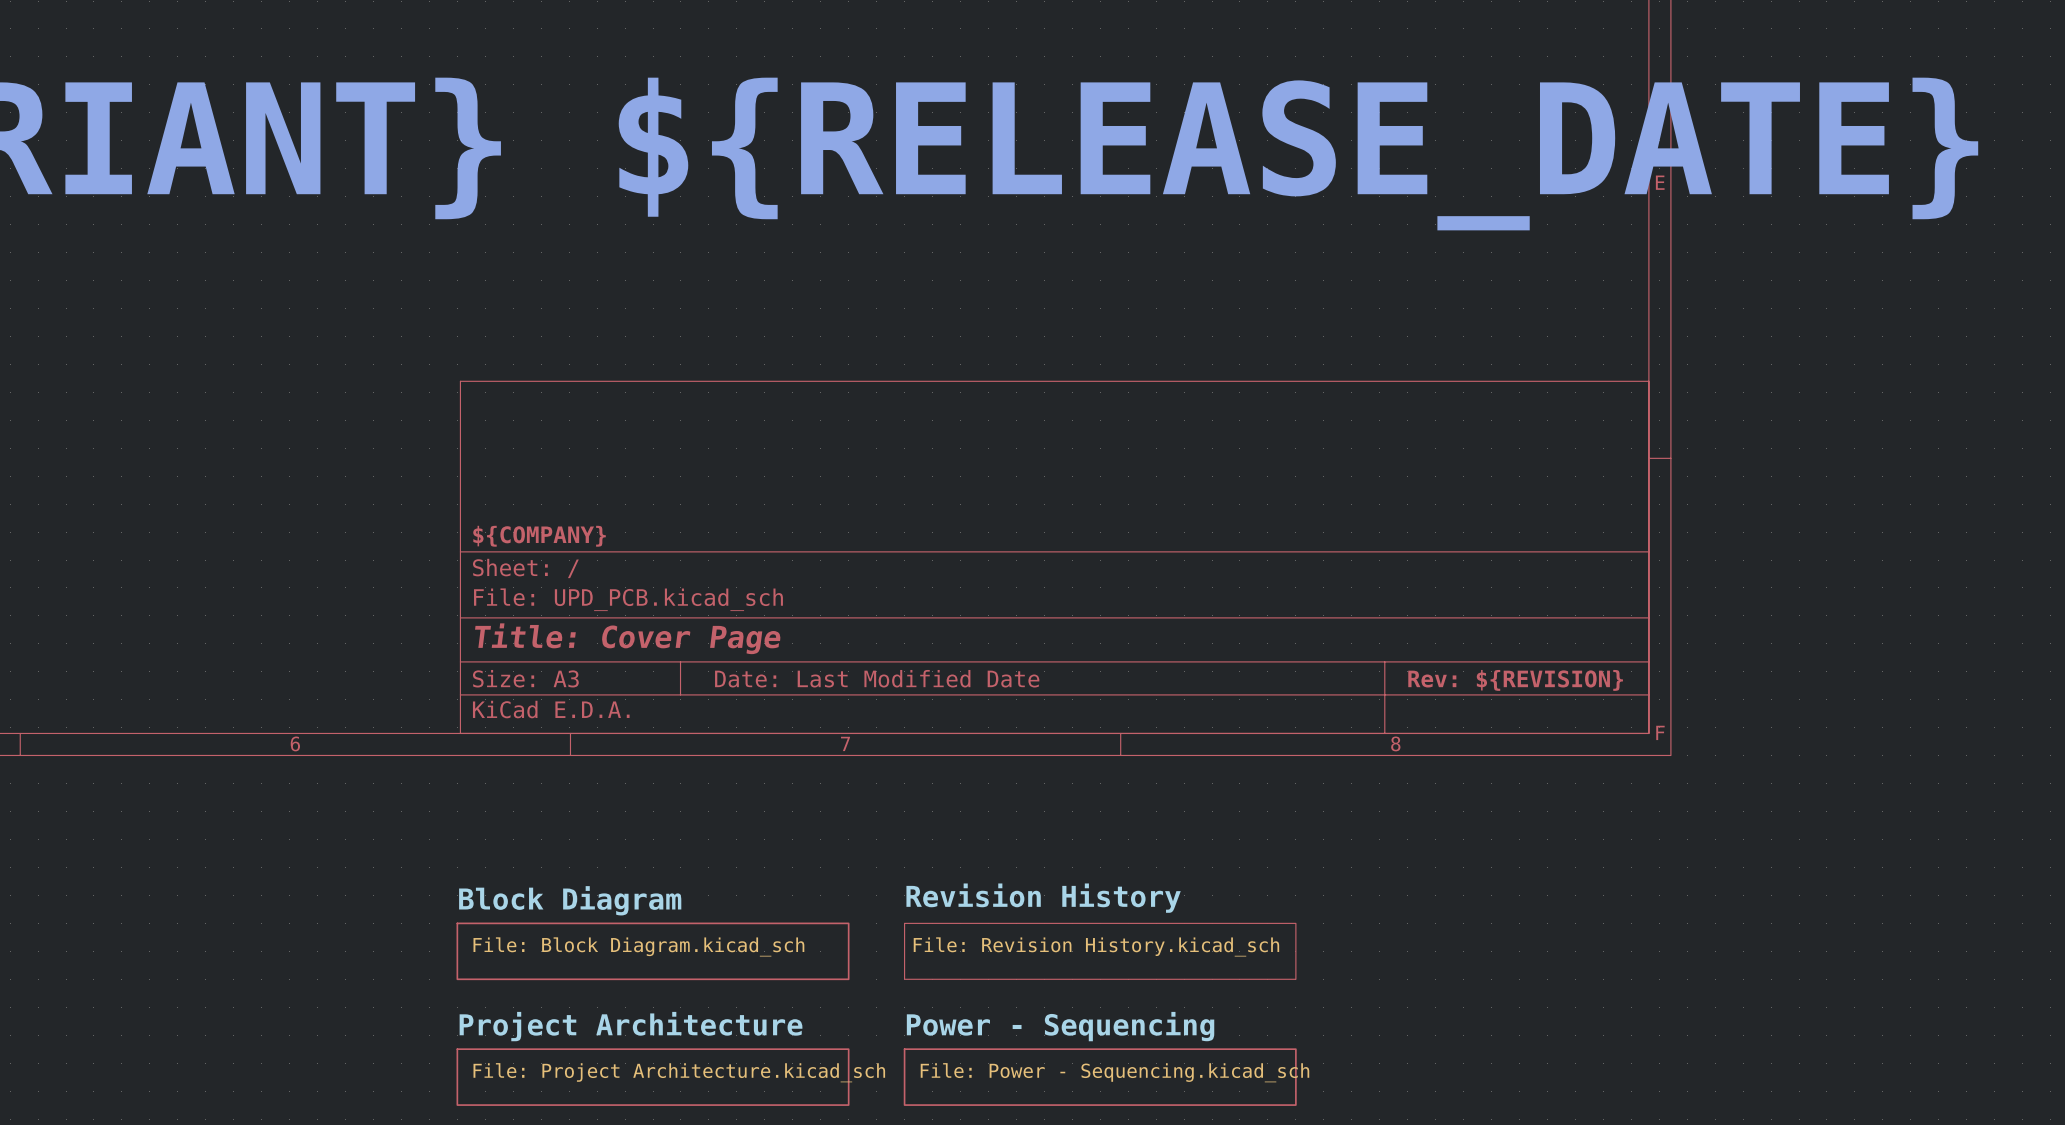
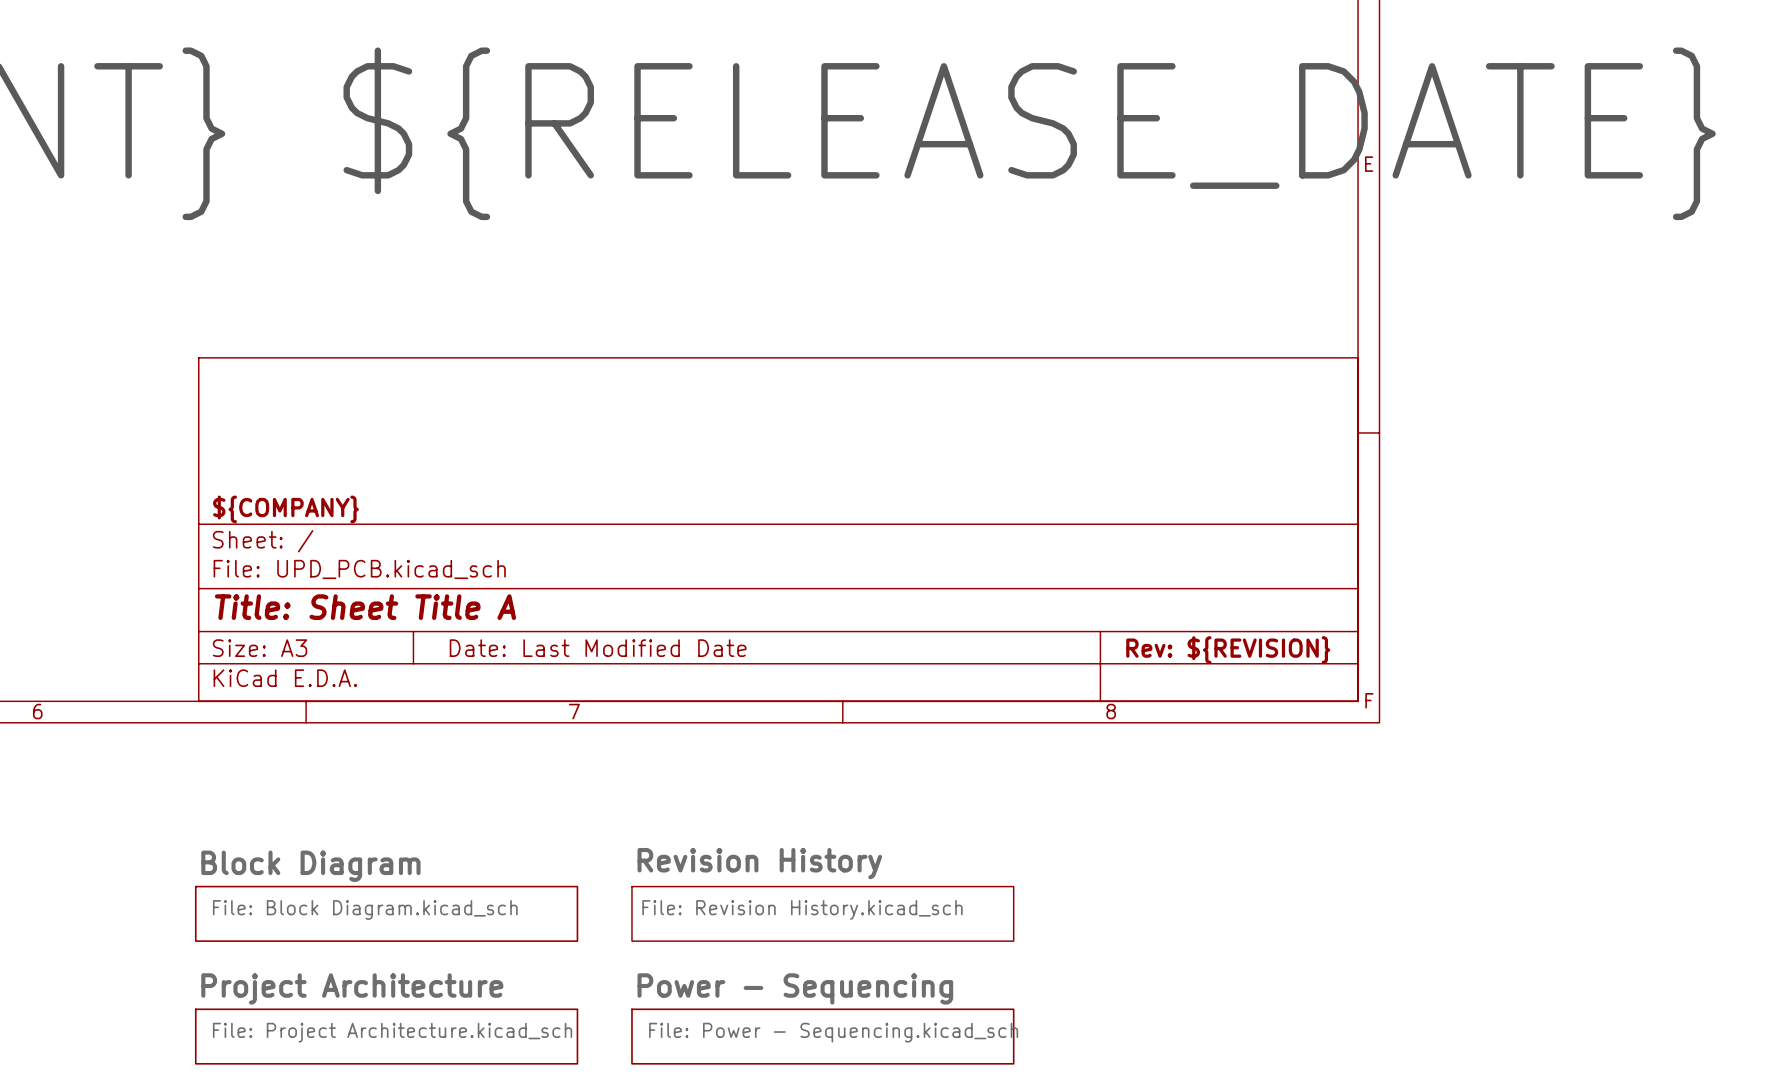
title block: Title: Cover Page (627, 638) -> Title: Sheet Title A (365, 607)

